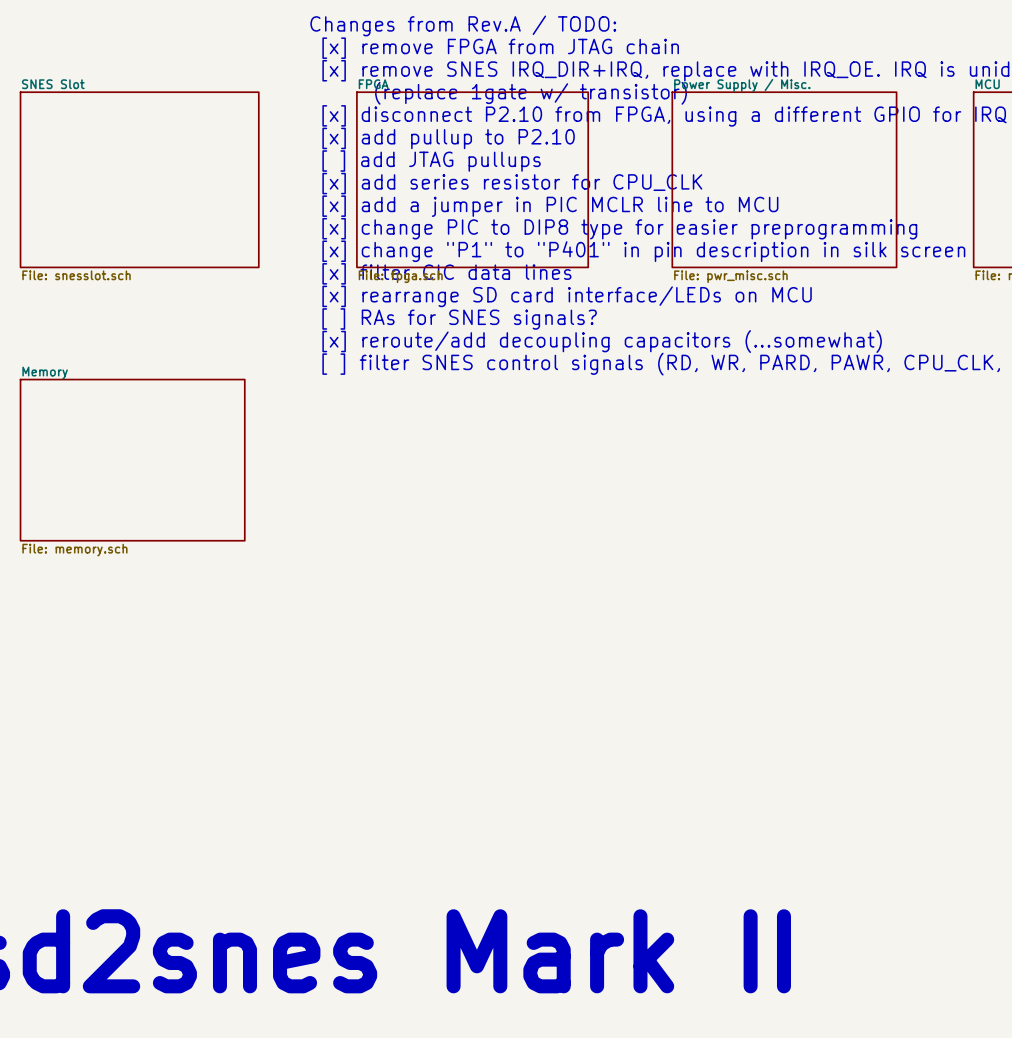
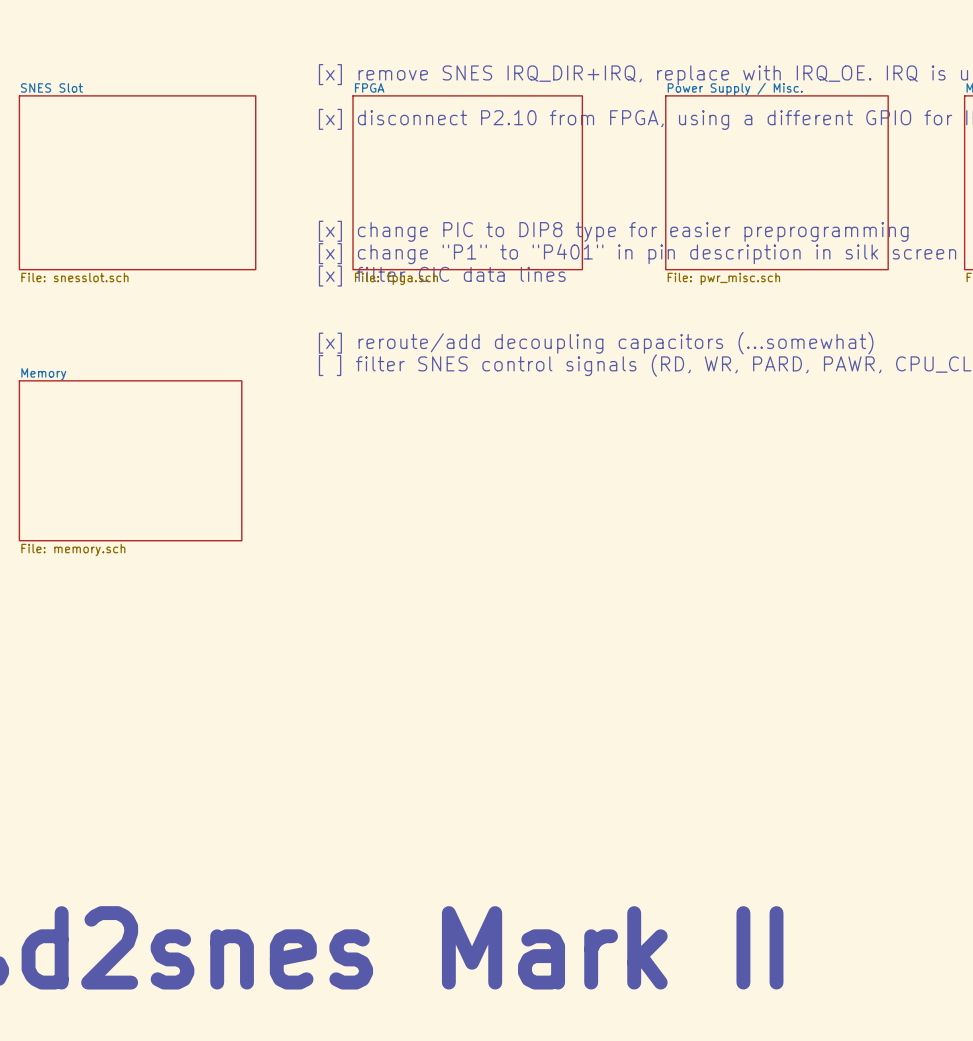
text: Changes from Rev.A / TODO: (463, 25) -> none
text: [x] remove FPGA from JTAG chain (500, 48) -> none
text: (replace 1gate w/ transistor) (531, 93) -> none
text: [x] add pullup to P2.10 (448, 138) -> none
text: [ ] add JTAG pullups (431, 161) -> none
text: [x] add series resistor for CPU_CLK (512, 183) -> none
text: [x] add a jumper in PIC MCLR line to MCU (550, 206) -> none
text: [x] rearrange SD card interface/LEDs on MCU (567, 296) -> none
text: [ ] RAs for SNES signals? (459, 318) -> none

